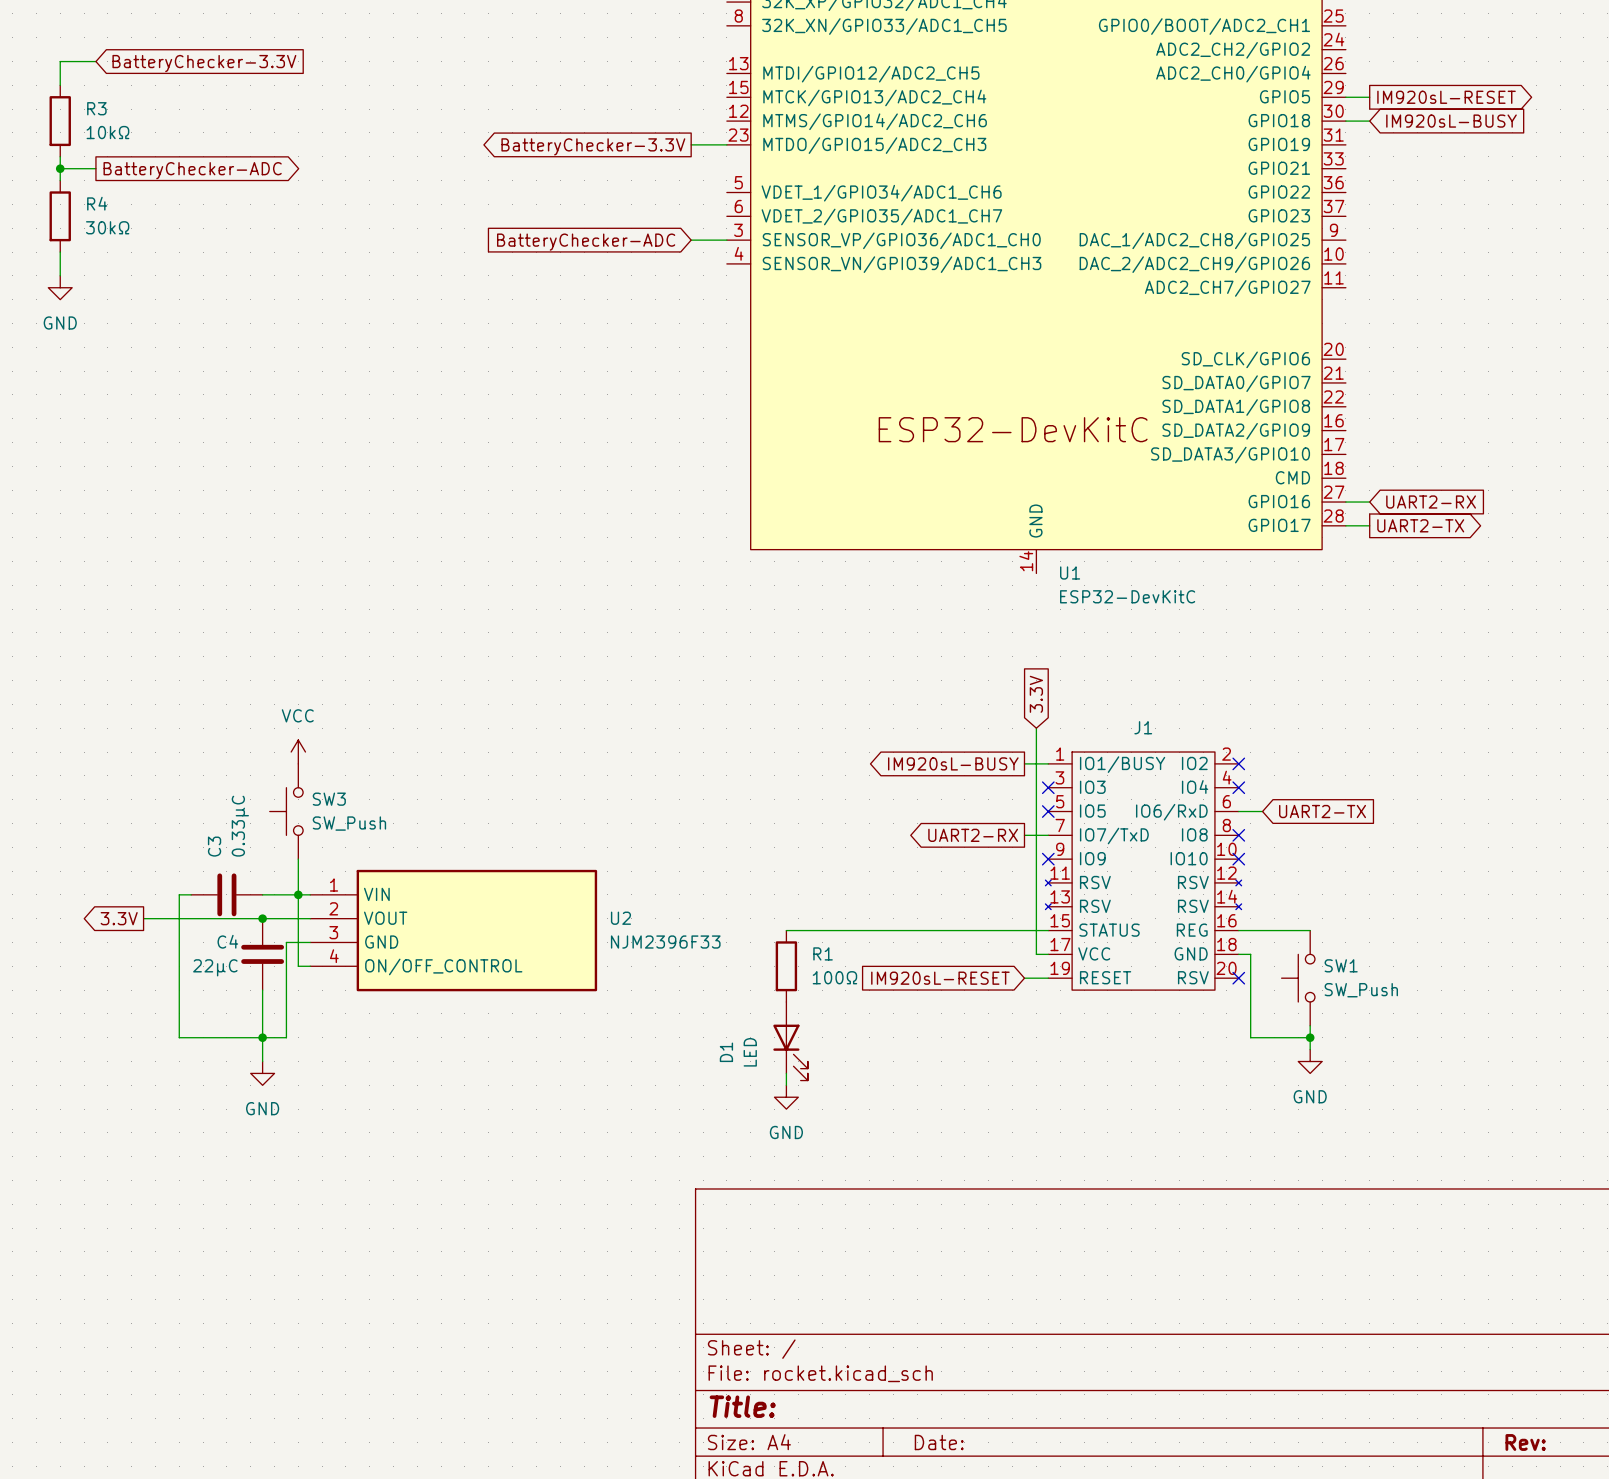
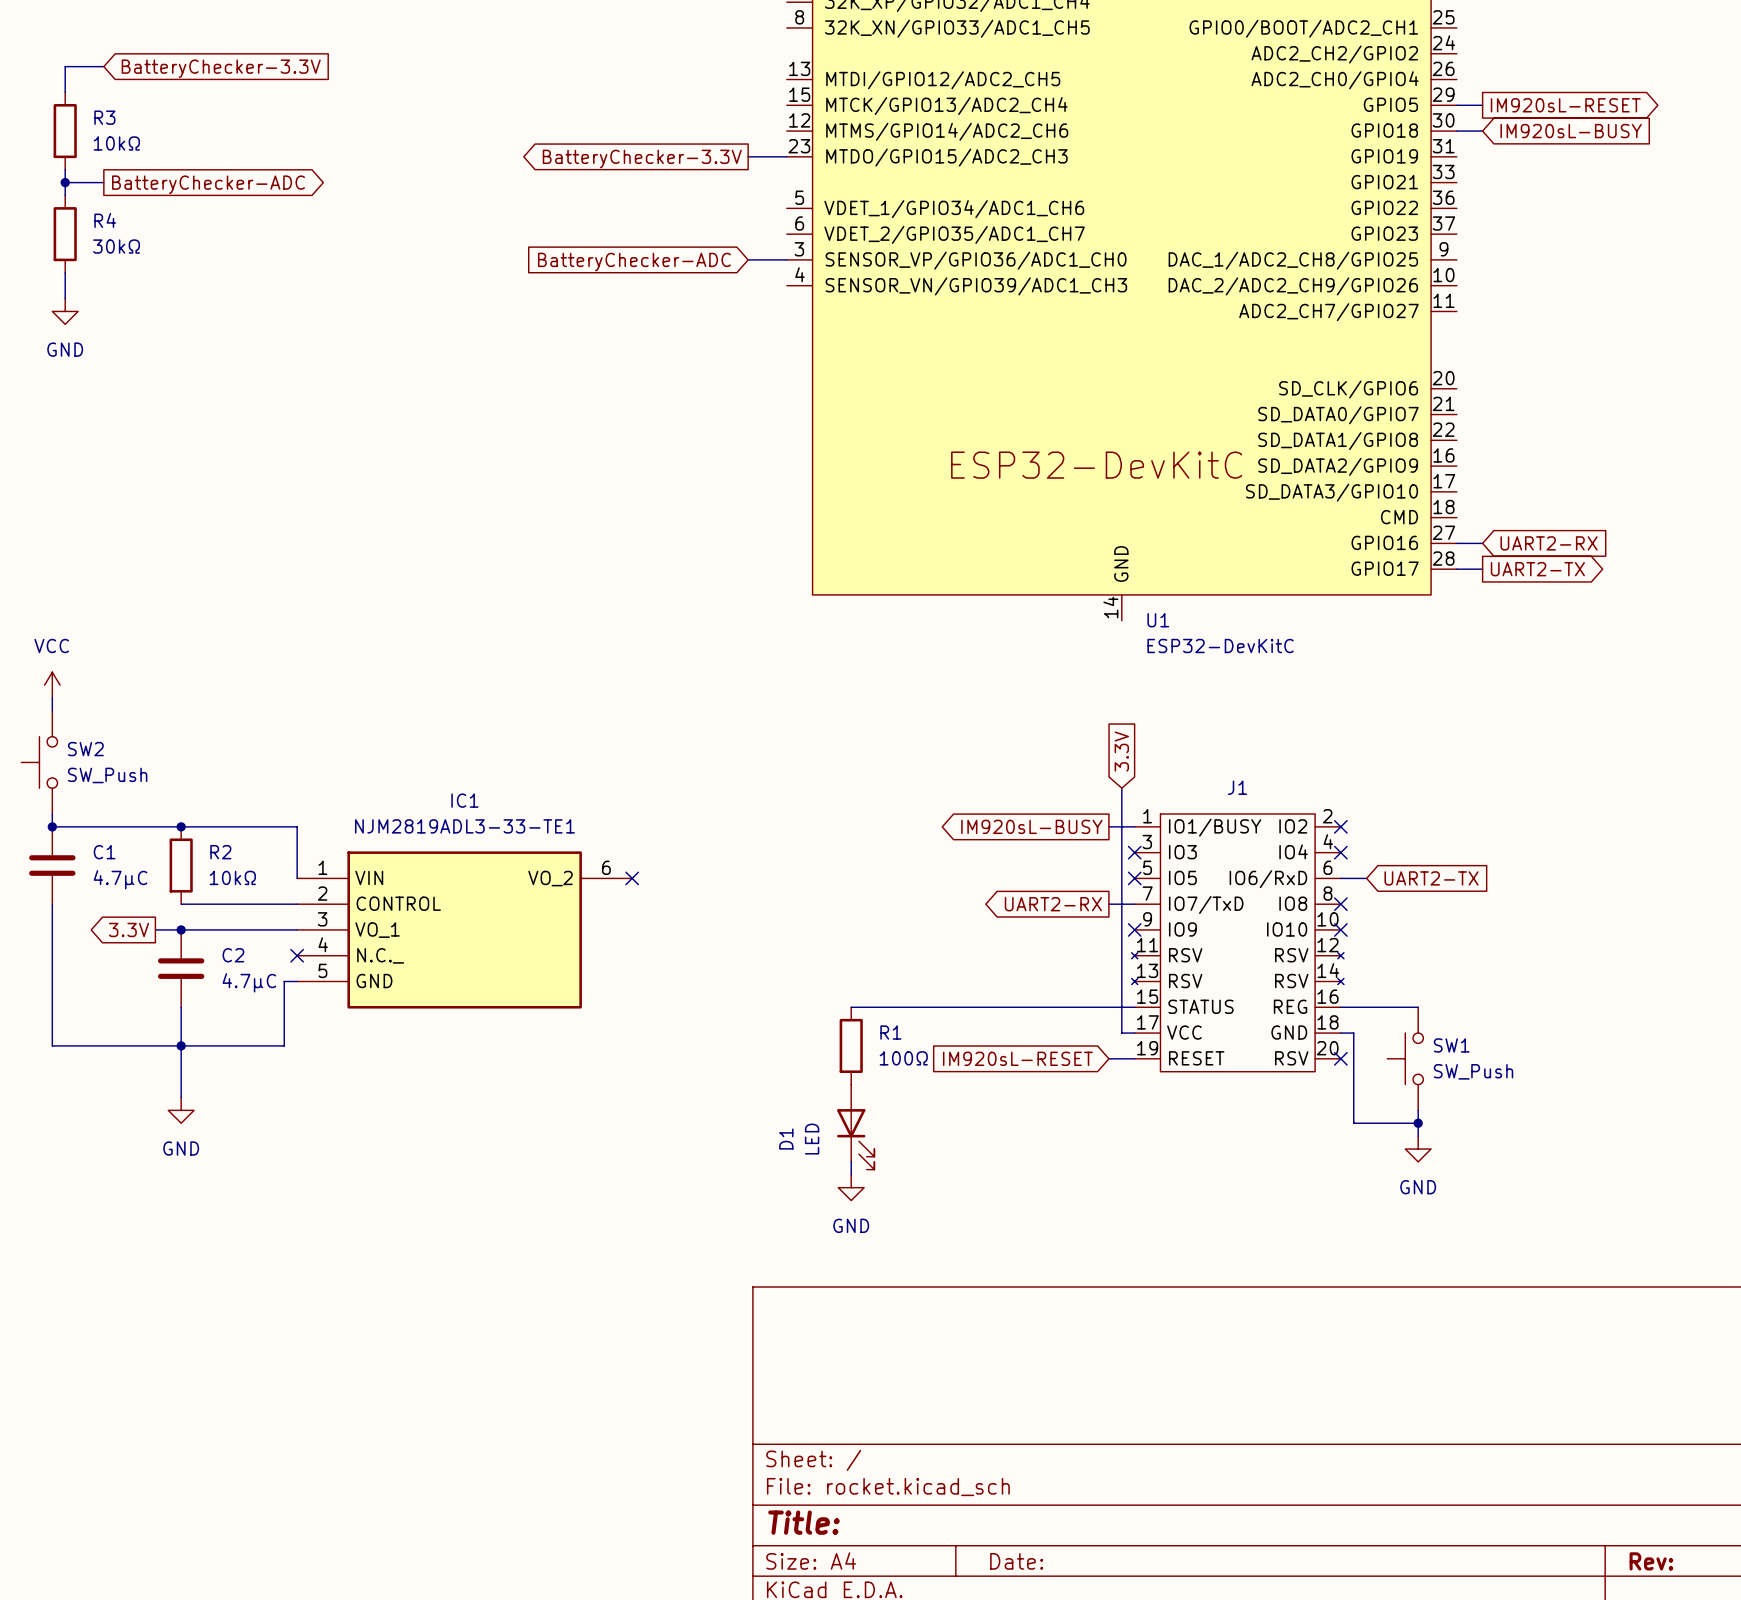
power symbol: none -> VCC (52, 685)
wire: none -> (52, 698) (52, 710)
SW2: none -> SW_Push (39, 762)
wire: none -> (52, 813) (52, 826) (297, 826) (297, 878)
power symbol: VCC (298, 752) -> none
junction: none -> (52, 826)
junction: none -> (181, 826)
C1: none -> 4.7μC (52, 865)
R2: none -> 10kΩ (181, 865)
SW3: SW_Push (286, 811) -> none
no-connect mark: none -> (632, 878)
wire: none -> (52, 904) (52, 1045) (284, 1045) (284, 981) (297, 981)
wire: none -> (181, 904) (297, 904)
wire: none -> (155, 929) (297, 929)
junction: none -> (181, 929)
wire: (298, 859) (298, 966) (310, 966) -> none
IC1: none -> NJM2819ADL3-33-TE1 (464, 929)
no-connect mark: none -> (297, 955)
C2: none -> 4.7μC (181, 968)
wire: (191, 894) (179, 894) (179, 1037) (286, 1037) (286, 942) (310, 942) -> none
C3: 0.33μC (226, 894) -> none
wire: (262, 894) (310, 894) -> none
junction: (298, 894) -> none
global label position: 3.3V (119, 918) -> 3.3V (129, 929)
wire: (143, 918) (310, 918) -> none
junction: (262, 918) -> none
wire: none -> (181, 1007) (181, 1097)
U2: NJM2396F33 (453, 930) -> none
C4: 22μC (262, 954) -> none
junction: none -> (181, 1045)
wire: (262, 990) (262, 1061) -> none
junction: (262, 1037) -> none
power symbol position: GND (262, 1073) -> GND (181, 1110)

